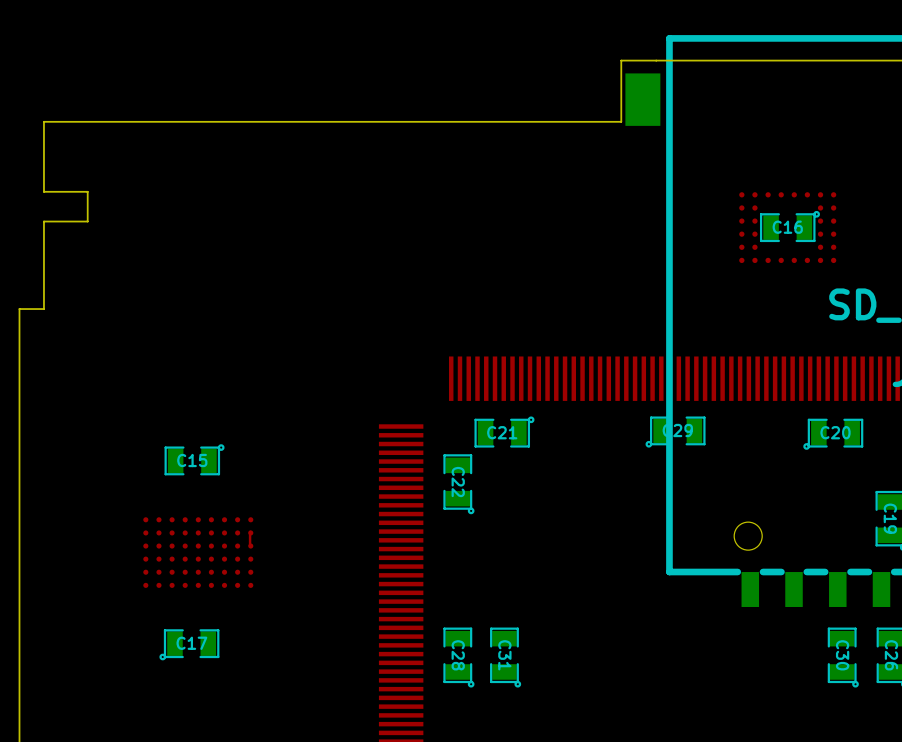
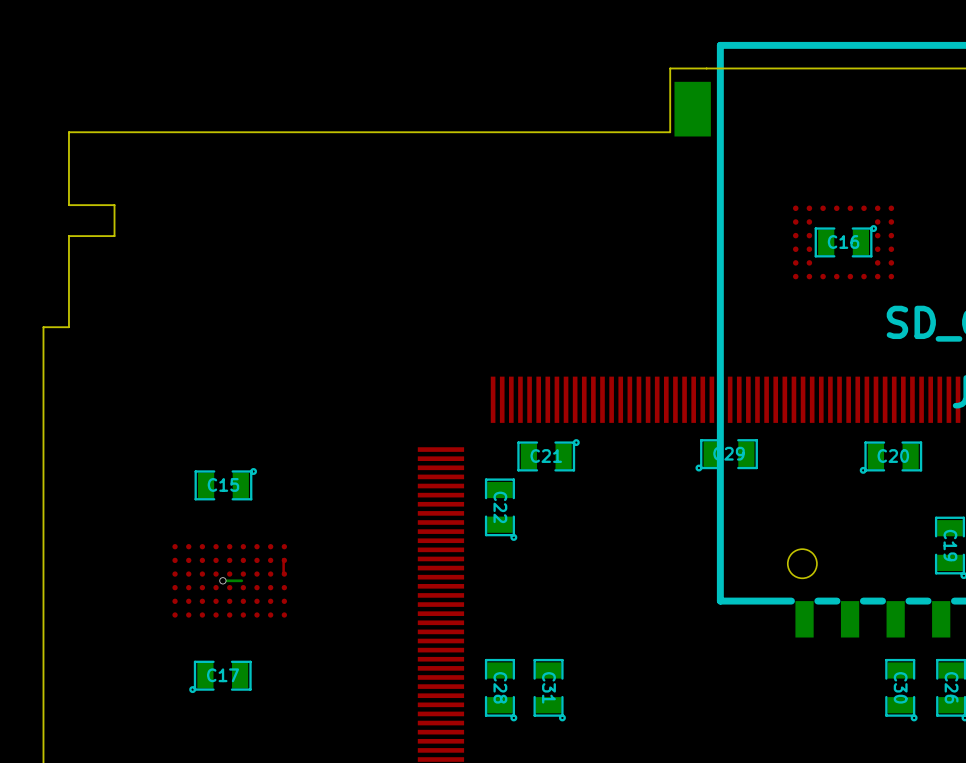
via: none -> (222, 580)
bottom track: none -> (241, 580) (222, 580)

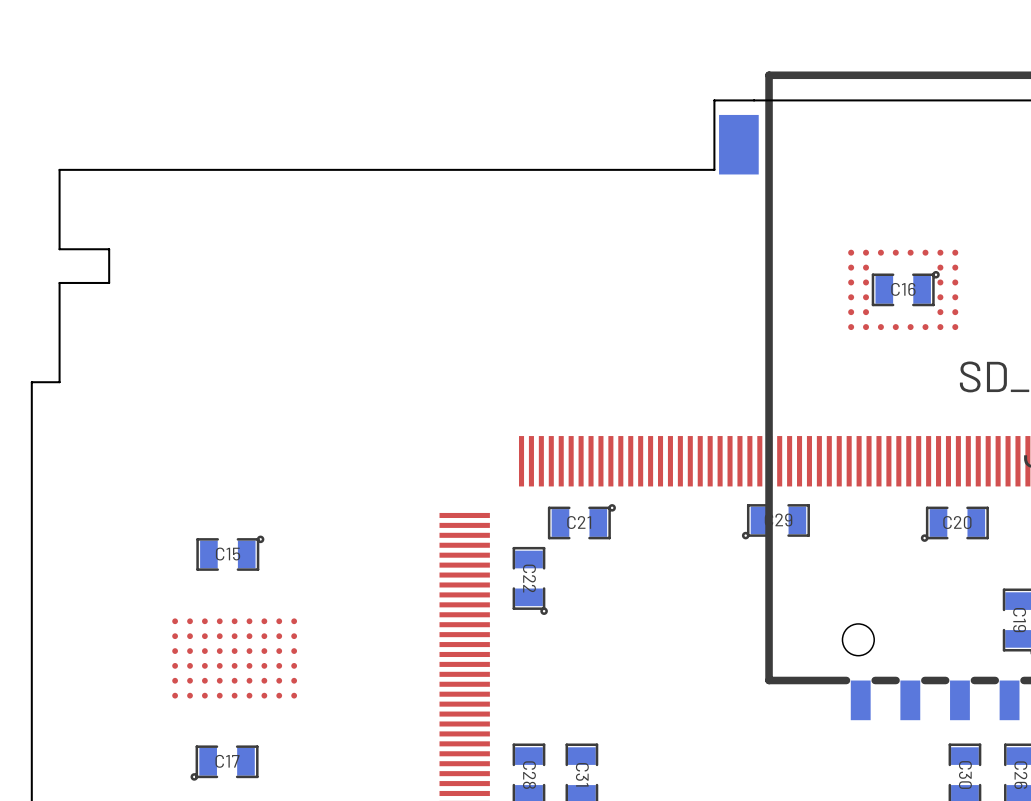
top track: (283, 559) (283, 573) -> none
via: (222, 580) -> none
bottom track: (241, 580) (222, 580) -> none

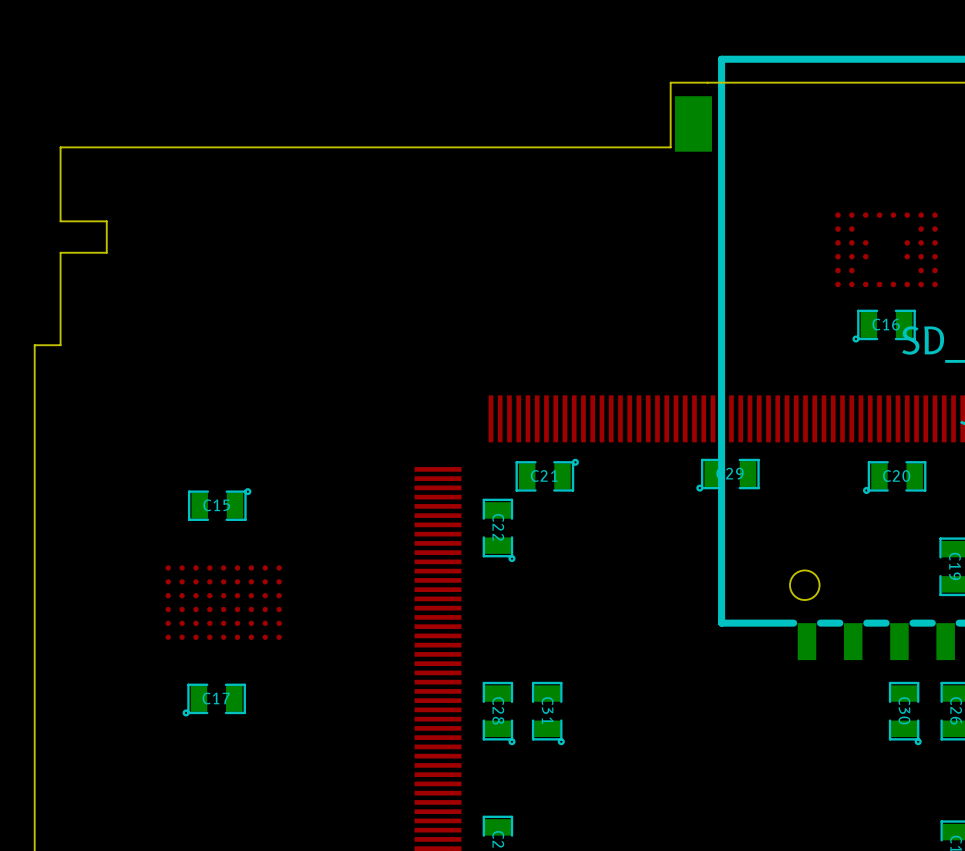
C16 rotation: 0° (905, 288) -> 180° (884, 326)
C16 position: (905, 288) -> (884, 326)
part position: (903, 289) -> (886, 249)

